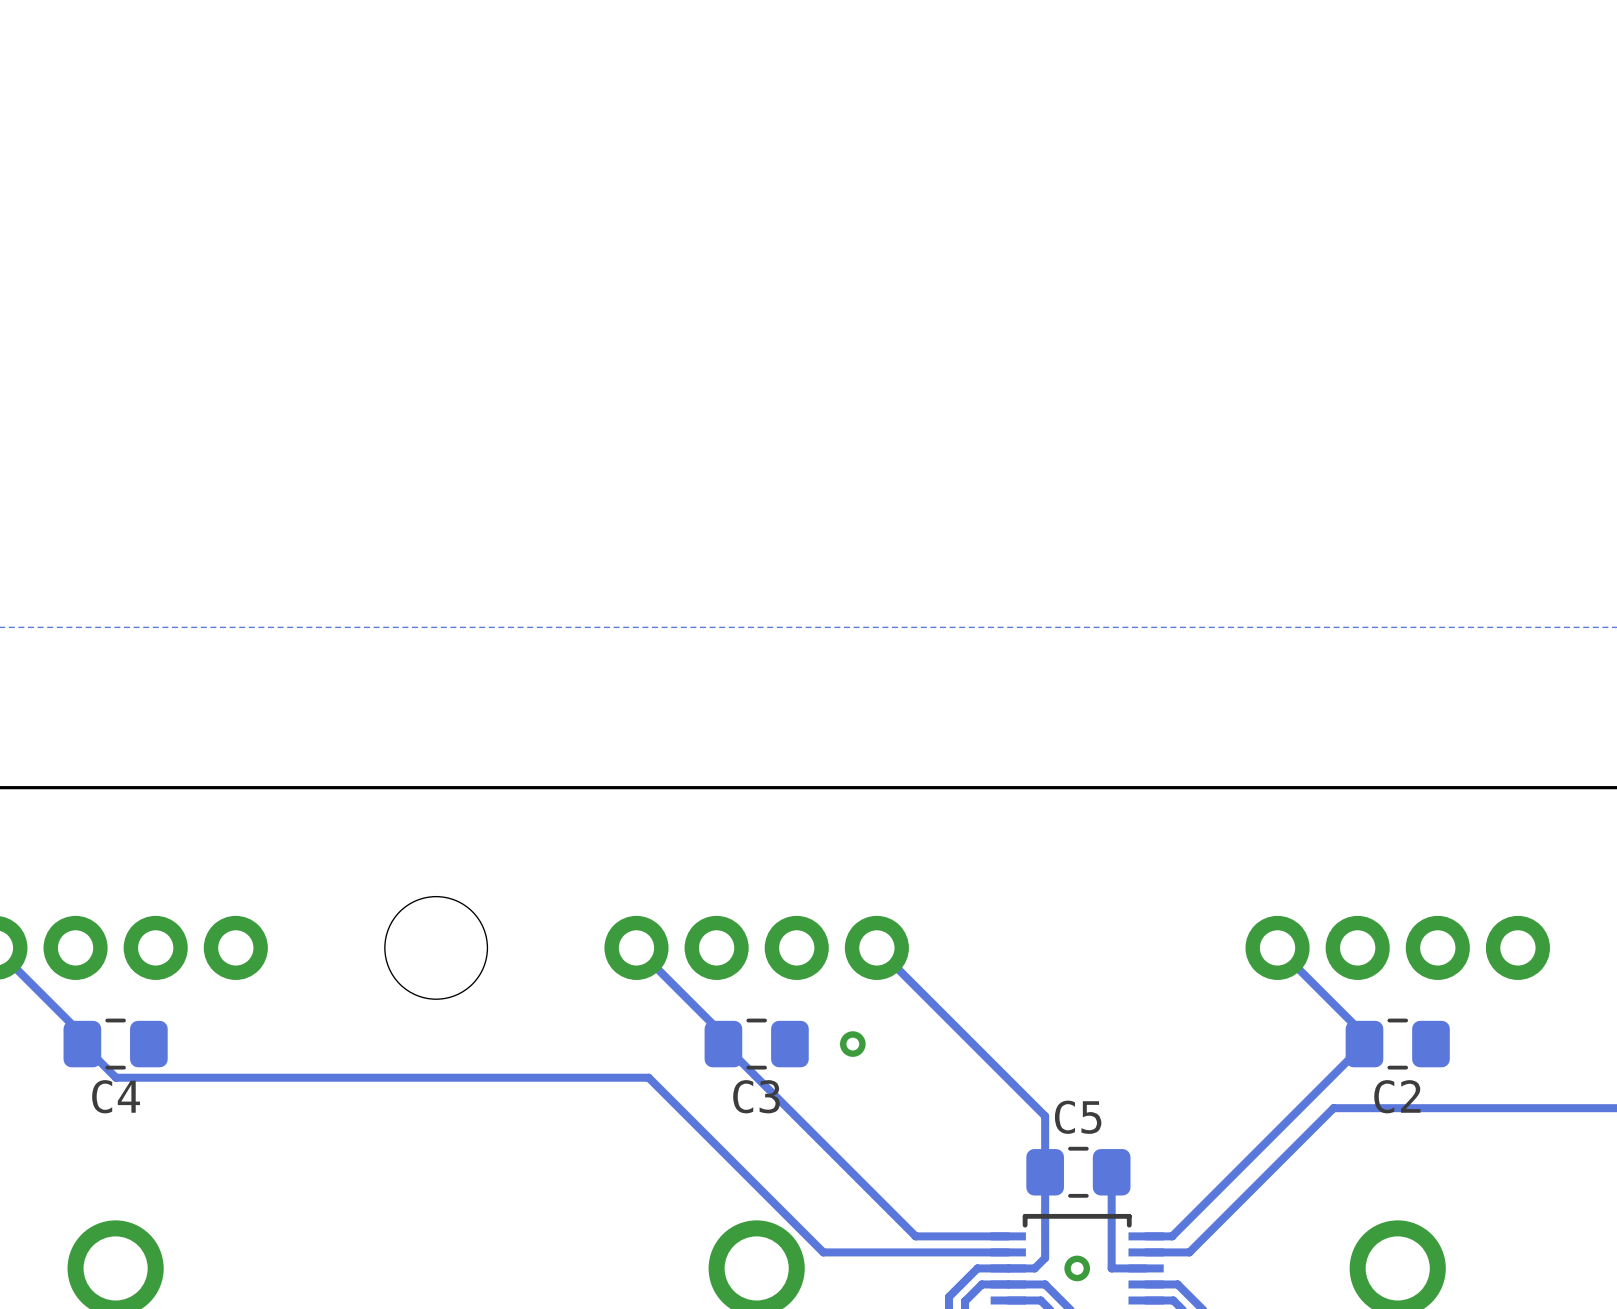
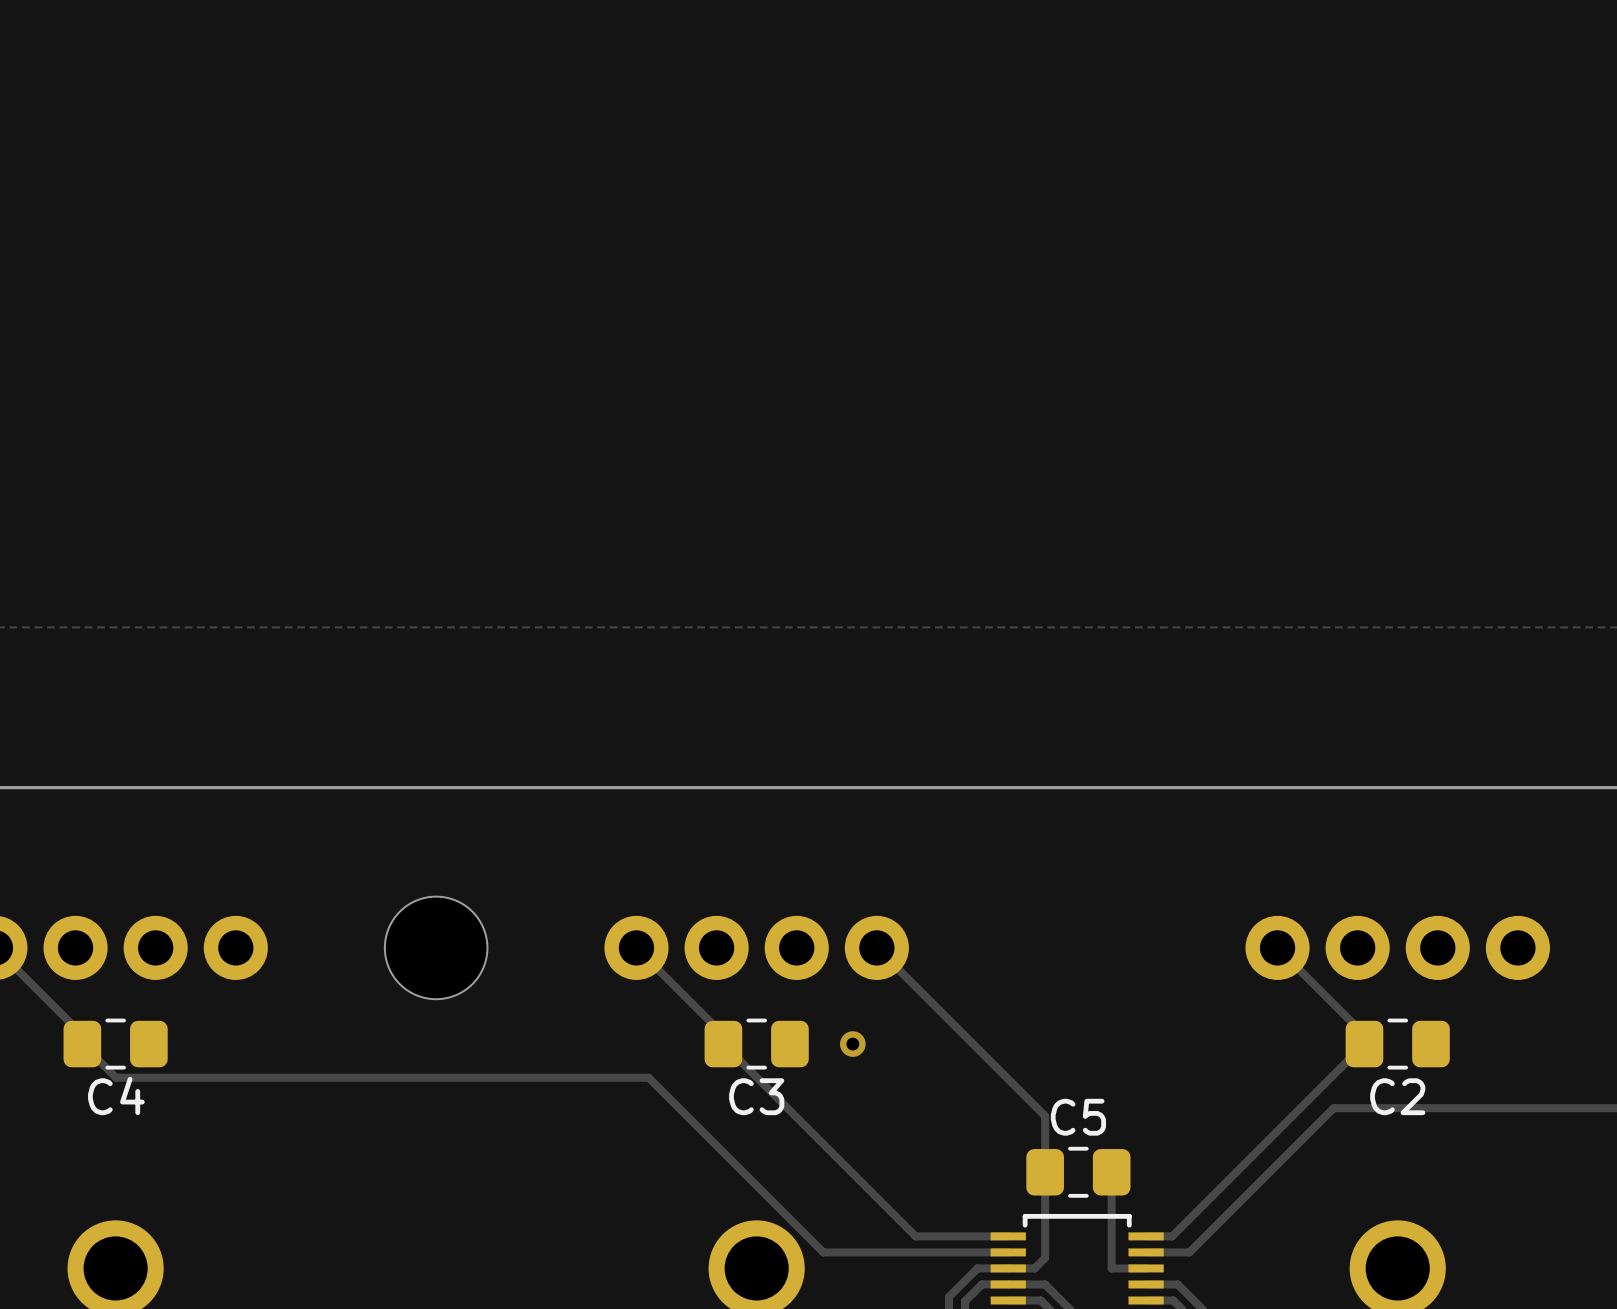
via: (1077, 1268) -> none

